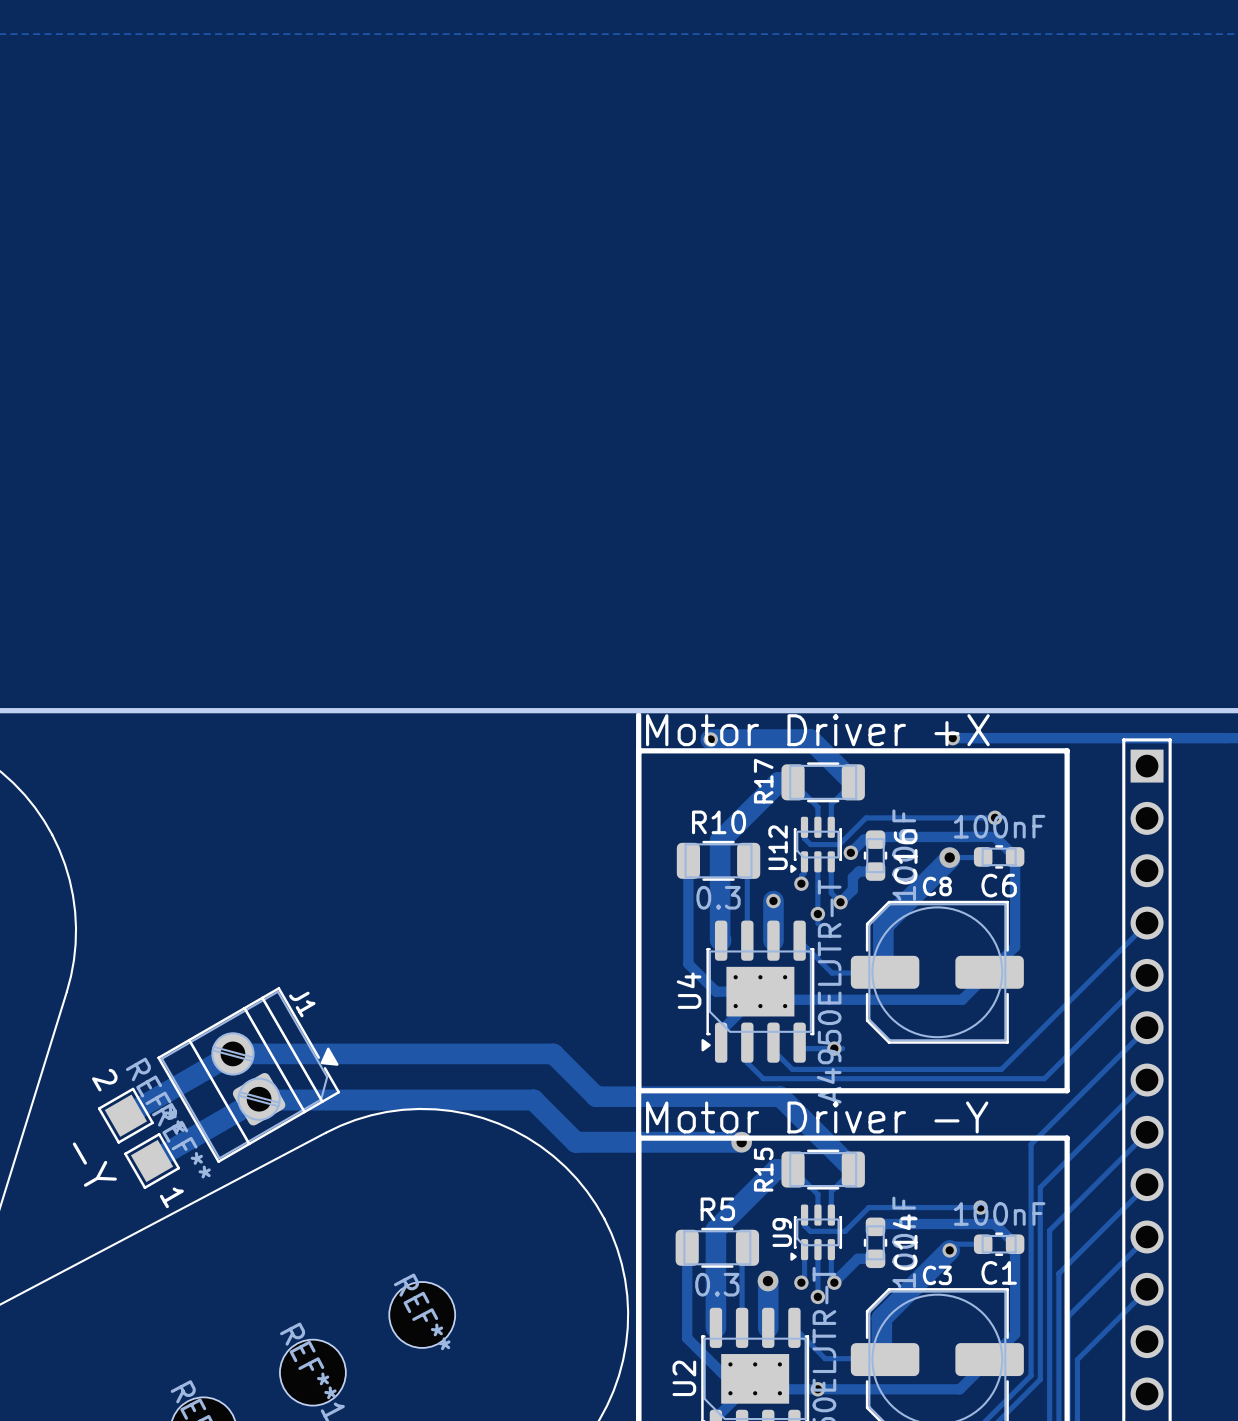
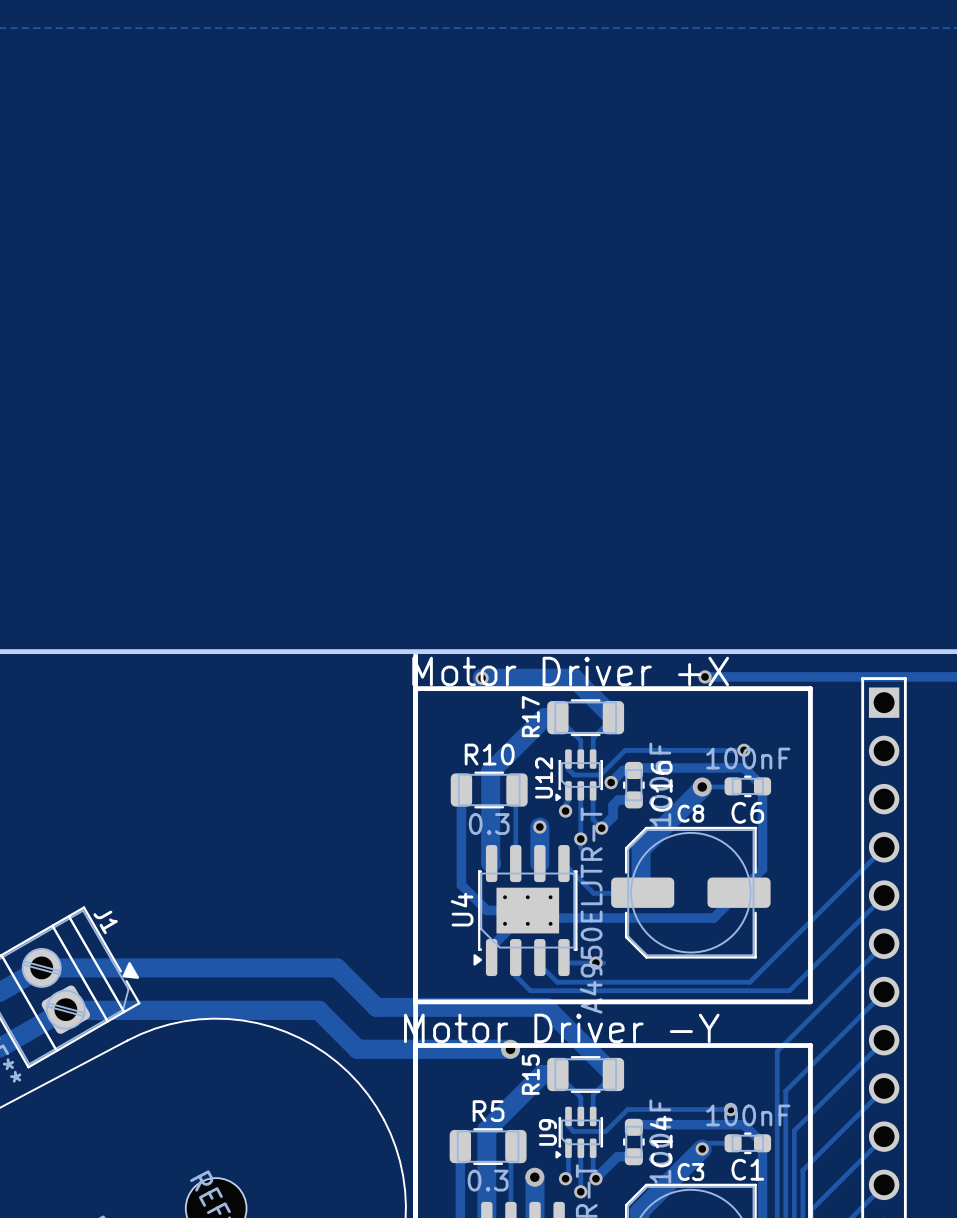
text position: Motor Driver +X (817, 730) -> Motor Driver +X (570, 671)
text position: Motor Driver -Y (817, 1117) -> Motor Driver -Y (561, 1028)

